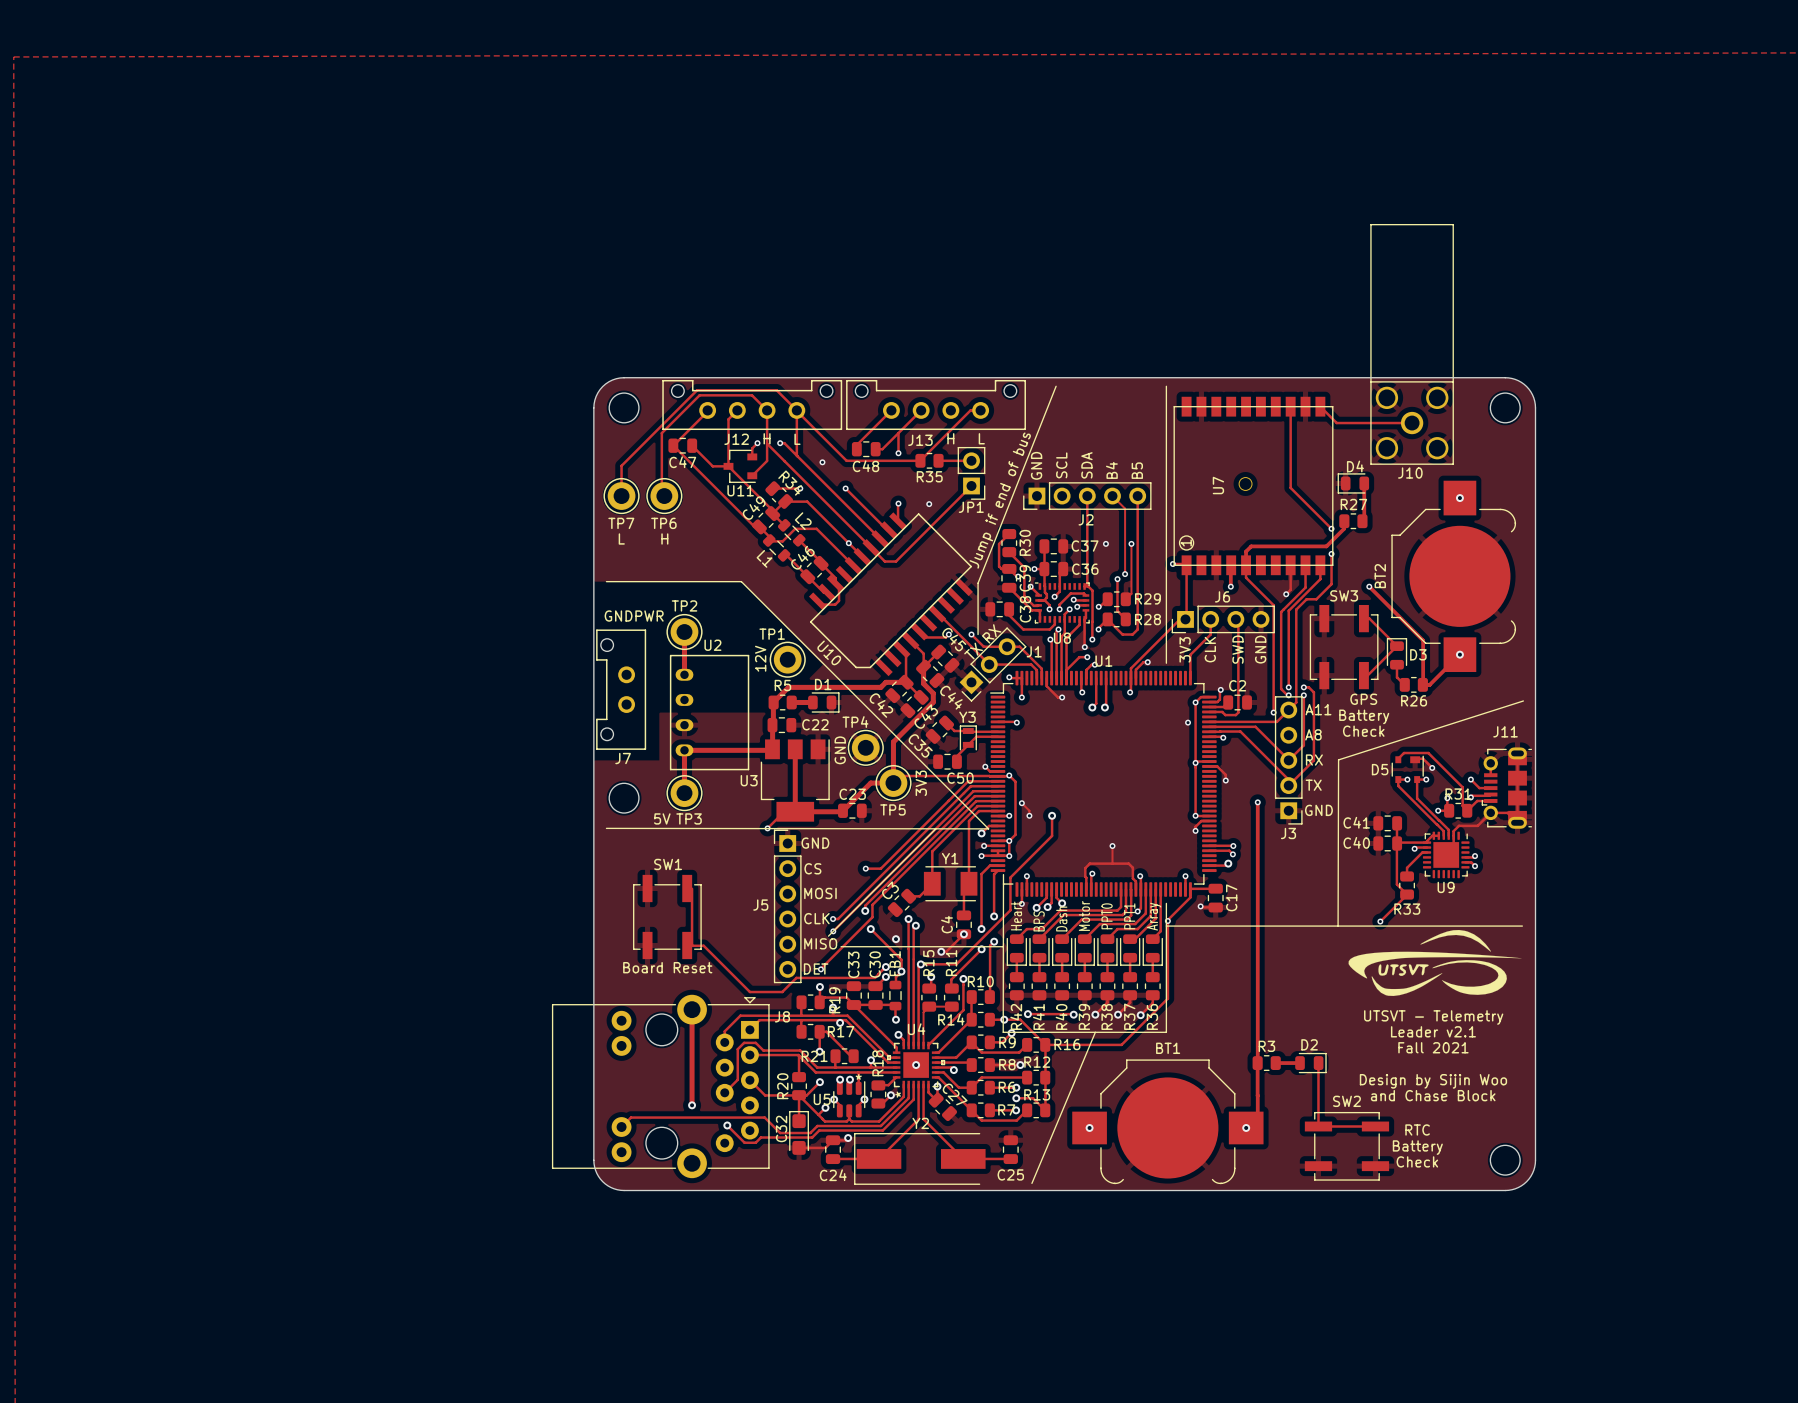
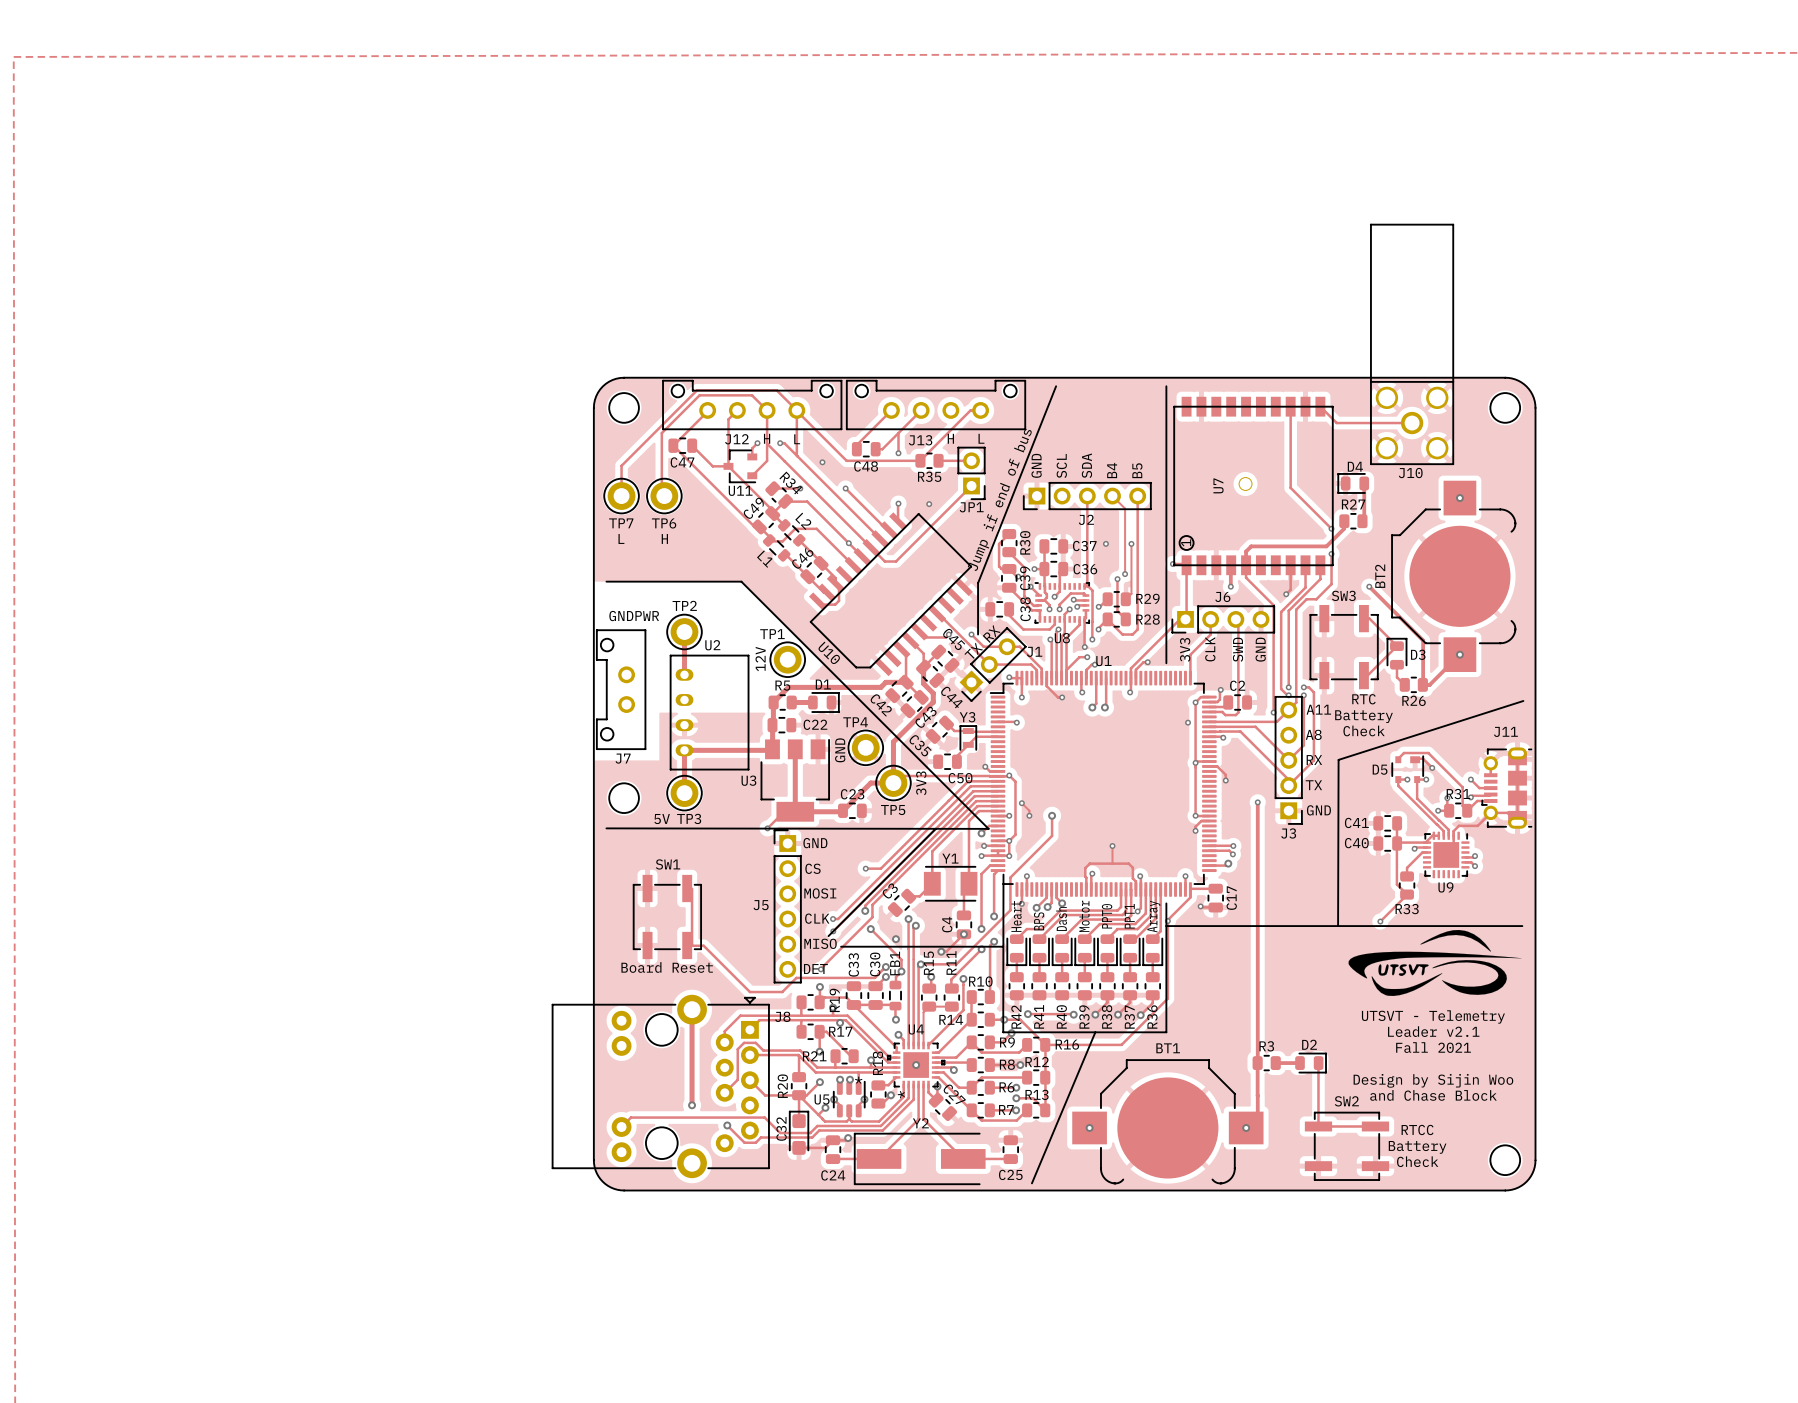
text: GPS (1363, 699) -> RTC (1363, 699)
text: RTC (1417, 1129) -> RTCC (1417, 1129)

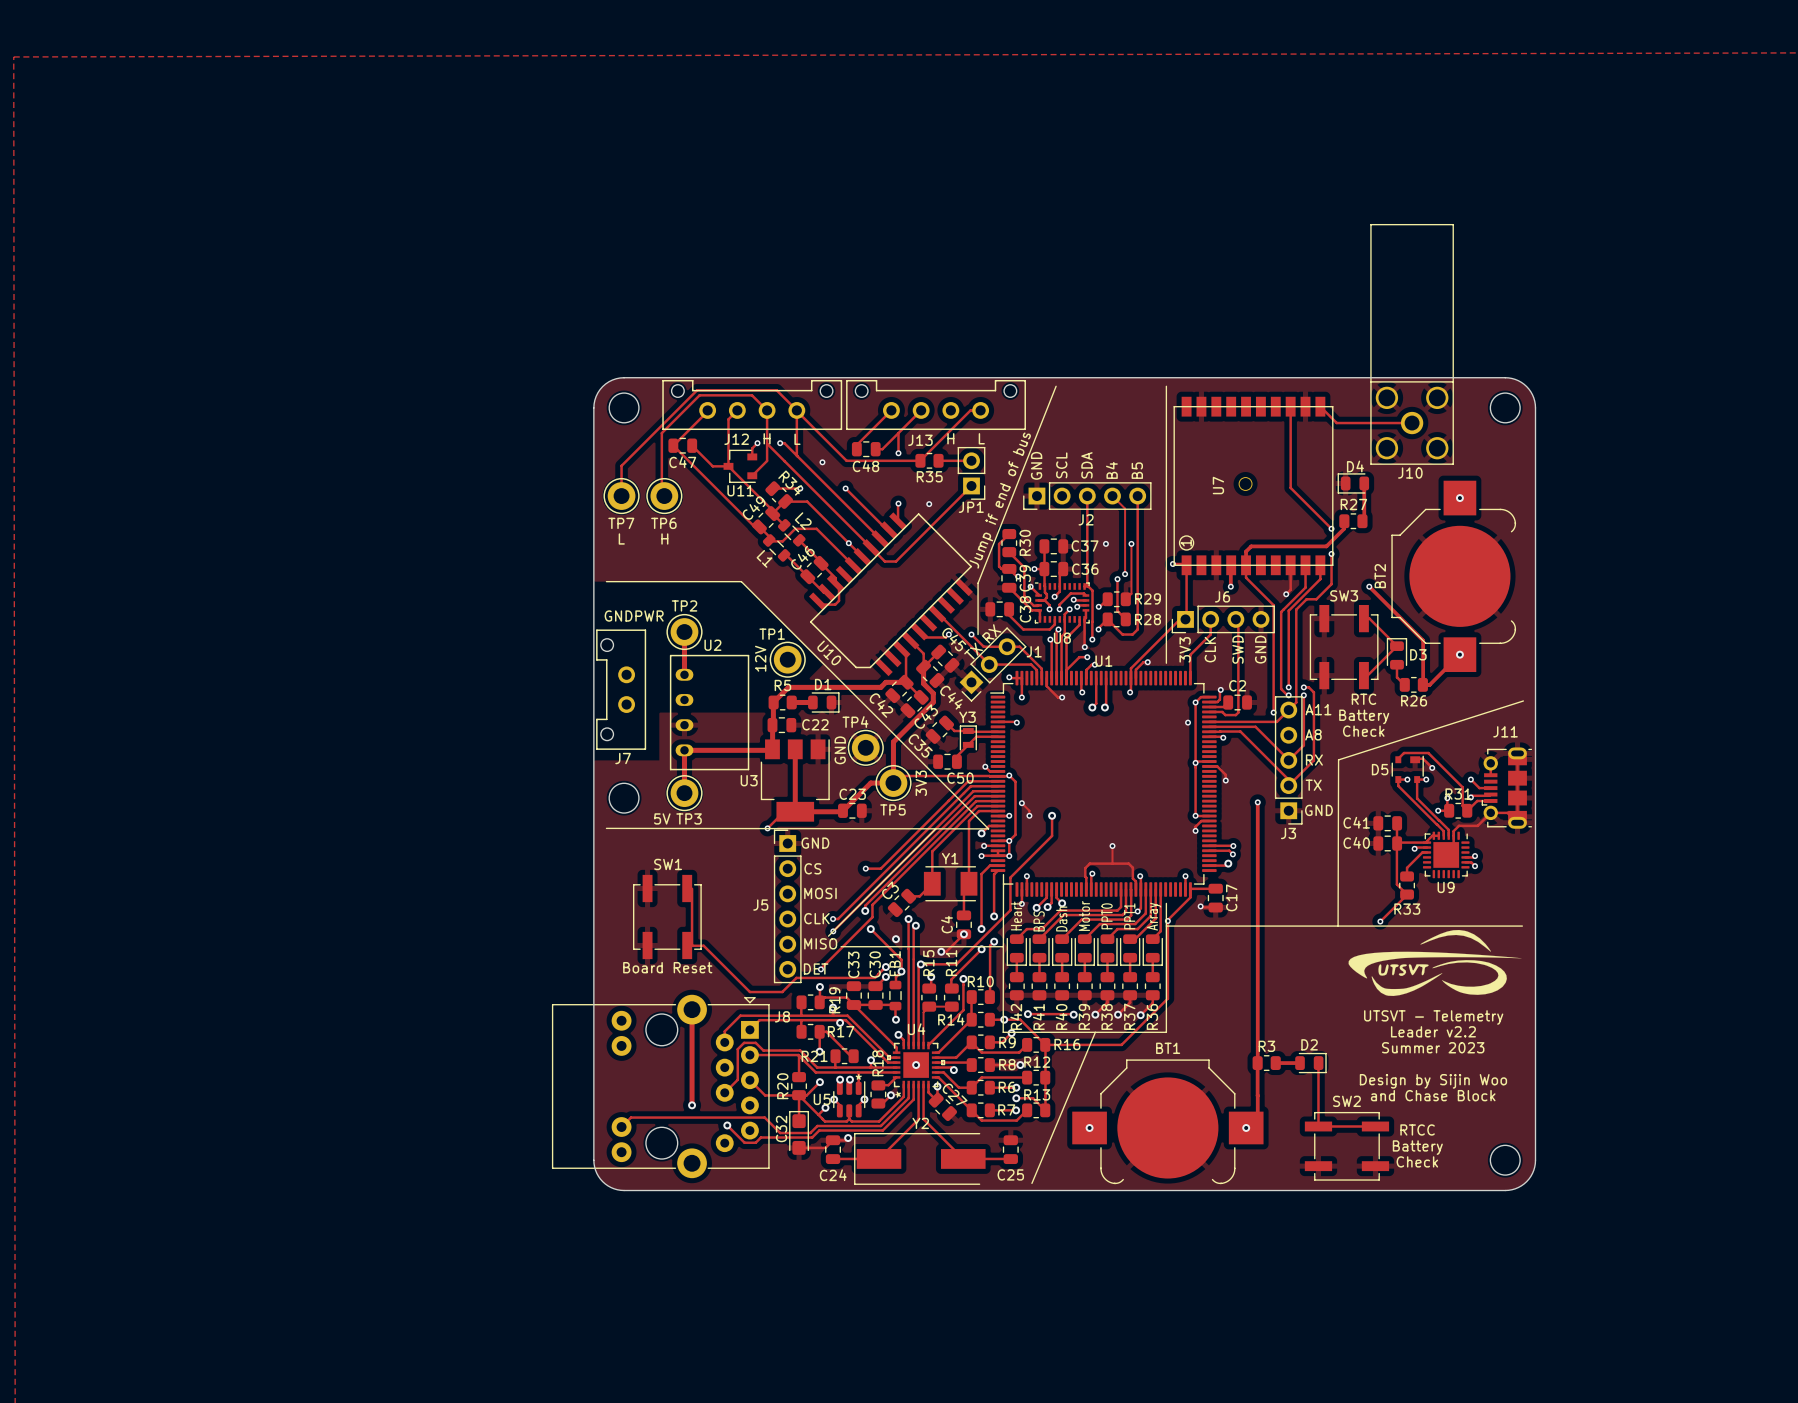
text: Leader v2.1 (1433, 1031) -> Leader v2.2 (1433, 1031)
text: Fall 2021 (1433, 1047) -> Summer 2023 (1433, 1047)

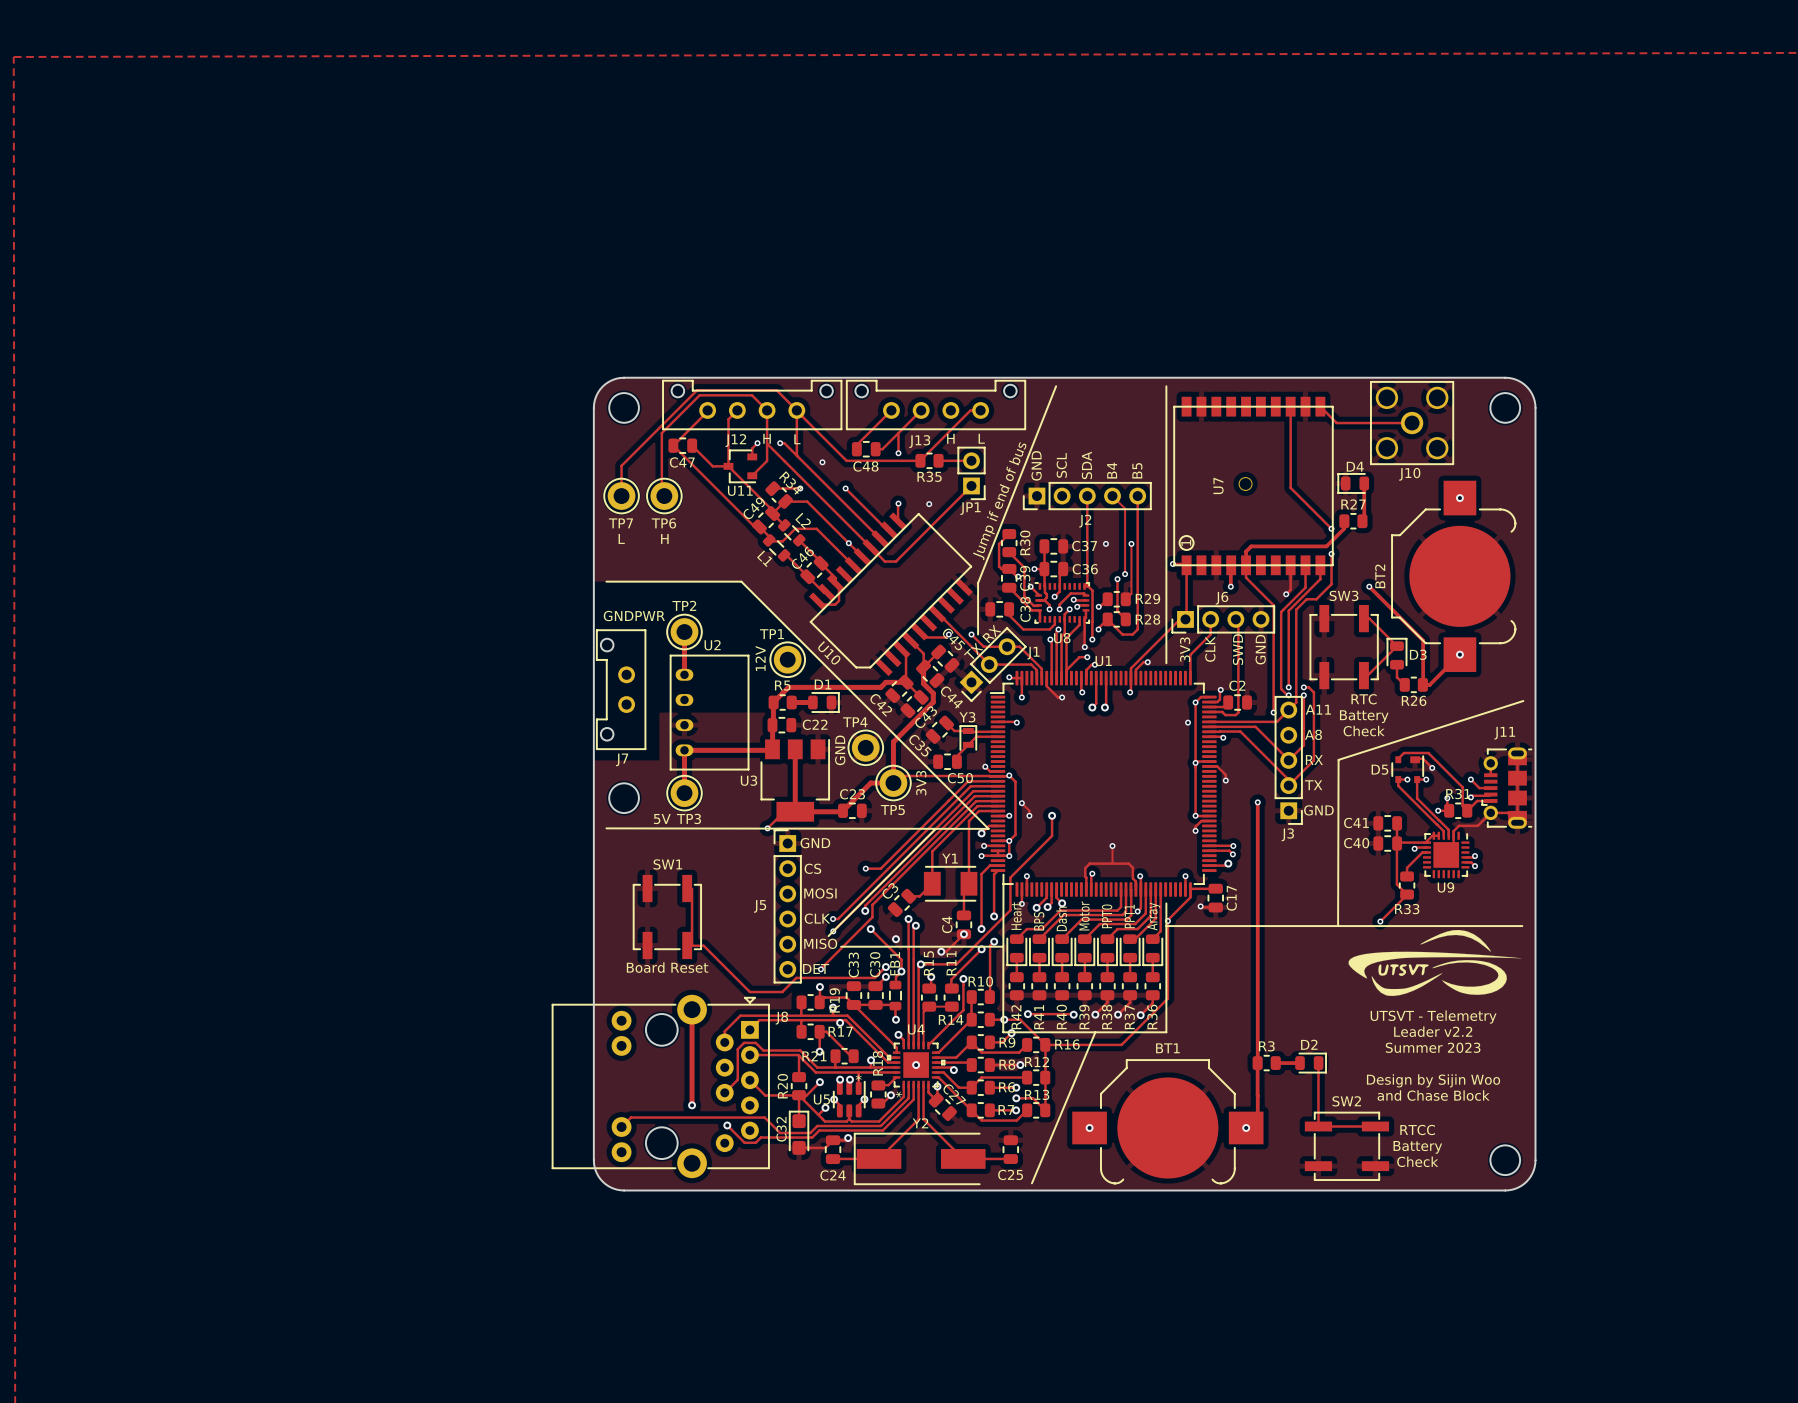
line: (1370, 224) (1453, 224) (1453, 381) -> none
line: (1370, 224) (1370, 381) -> none

